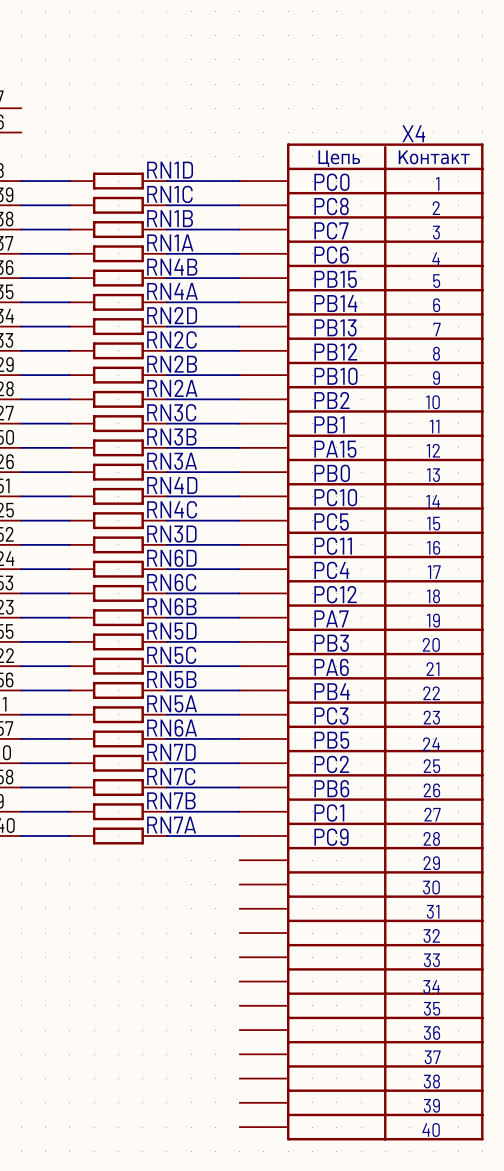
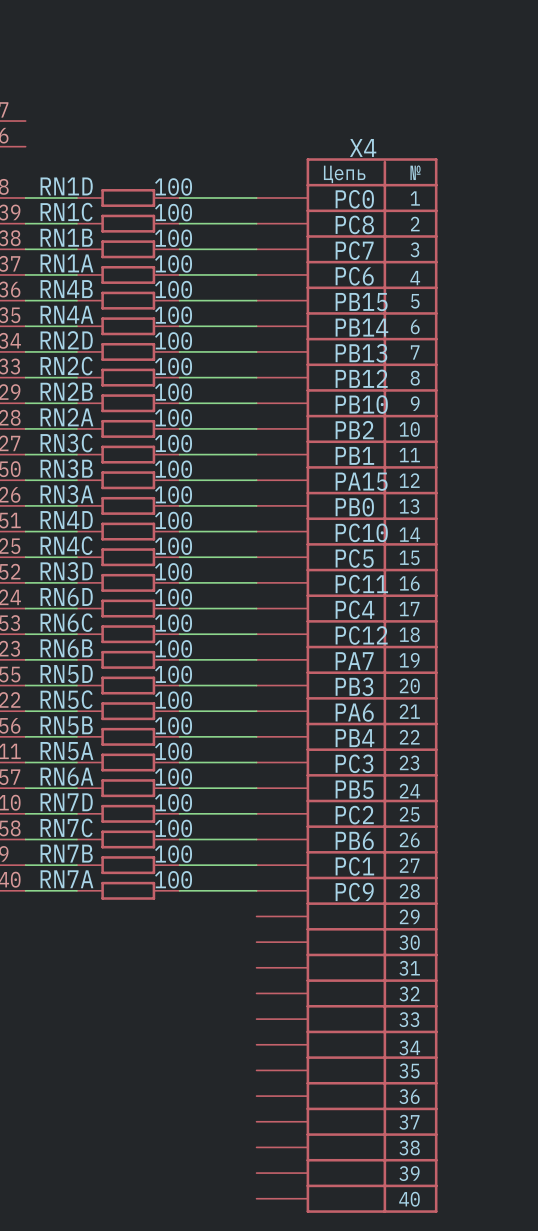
X4 name position: X4 (413, 133) -> X4 (363, 147)
X4 symbol: [239, 143, 484, 1141] -> [256, 158, 438, 1213]
text: none -> 100 (173, 186)
RN1D name position: RN1D (170, 170) -> RN1D (66, 186)
text: none -> 100 (173, 212)
RN1C name position: RN1C (169, 194) -> RN1C (66, 212)
RN1B name position: RN1B (170, 218) -> RN1B (66, 237)
text: none -> 100 (173, 238)
RN1A name position: RN1A (170, 242) -> RN1A (66, 263)
text: none -> 100 (173, 263)
text: none -> 100 (173, 289)
RN4B name position: RN4B (172, 267) -> RN4B (66, 289)
text: none -> 100 (173, 315)
RN4A name position: RN4A (172, 291) -> RN4A (66, 314)
RN2D name position: RN2D (172, 315) -> RN2D (66, 340)
text: none -> 100 (173, 340)
RN2C name position: RN2C (171, 339) -> RN2C (66, 366)
text: none -> 100 (173, 366)
text: none -> 100 (173, 392)
RN2B name position: RN2B (172, 364) -> RN2B (66, 391)
text: none -> 100 (173, 417)
RN2A name position: RN2A (172, 388) -> RN2A (66, 417)
RN3C name position: RN3C (171, 412) -> RN3C (66, 443)
text: none -> 100 (173, 443)
text: none -> 100 (173, 469)
RN3B name position: RN3B (171, 437) -> RN3B (66, 468)
text: none -> 100 (173, 494)
RN3A name position: RN3A (172, 461) -> RN3A (66, 494)
text: none -> 100 (173, 520)
RN4D name position: RN4D (172, 485) -> RN4D (66, 520)
RN4C name position: RN4C (172, 509) -> RN4C (66, 545)
text: none -> 100 (173, 546)
text: none -> 100 (173, 571)
RN3D name position: RN3D (171, 534) -> RN3D (66, 571)
text: none -> 100 (173, 597)
RN6D name position: RN6D (171, 558) -> RN6D (66, 597)
RN6C name position: RN6C (171, 582) -> RN6C (66, 622)
text: none -> 100 (173, 623)
RN6B name position: RN6B (171, 606) -> RN6B (66, 648)
text: none -> 100 (173, 648)
text: none -> 100 (173, 674)
RN5D name position: RN5D (171, 631) -> RN5D (66, 674)
text: none -> 100 (173, 700)
RN5C name position: RN5C (171, 655) -> RN5C (66, 699)
RN5B name position: RN5B (171, 679) -> RN5B (66, 725)
text: none -> 100 (173, 725)
RN5A name position: RN5A (172, 703) -> RN5A (66, 751)
text: none -> 100 (173, 751)
text: none -> 100 (173, 777)
RN6A name position: RN6A (172, 728) -> RN6A (66, 776)
text: none -> 100 (173, 802)
RN7D name position: RN7D (171, 752) -> RN7D (66, 802)
RN7C name position: RN7C (171, 776) -> RN7C (66, 827)
text: none -> 100 (173, 828)
RN7B name position: RN7B (171, 800) -> RN7B (66, 853)
text: none -> 100 (173, 854)
text: none -> 100 (173, 879)
RN7A name position: RN7A (171, 825) -> RN7A (66, 879)

